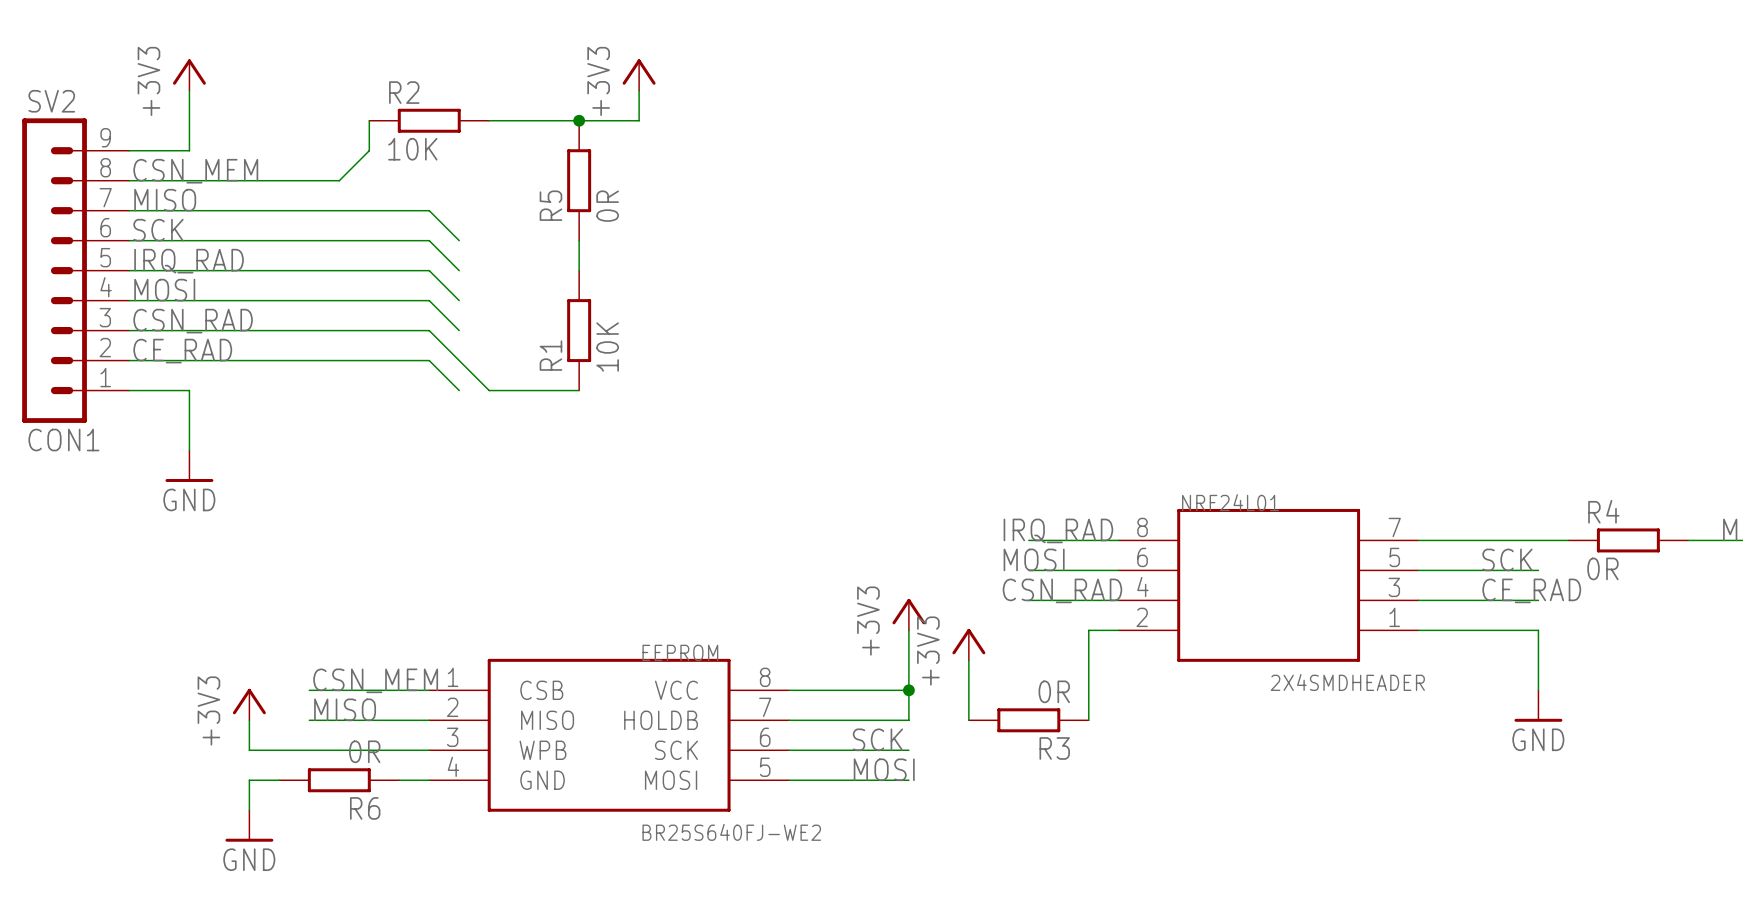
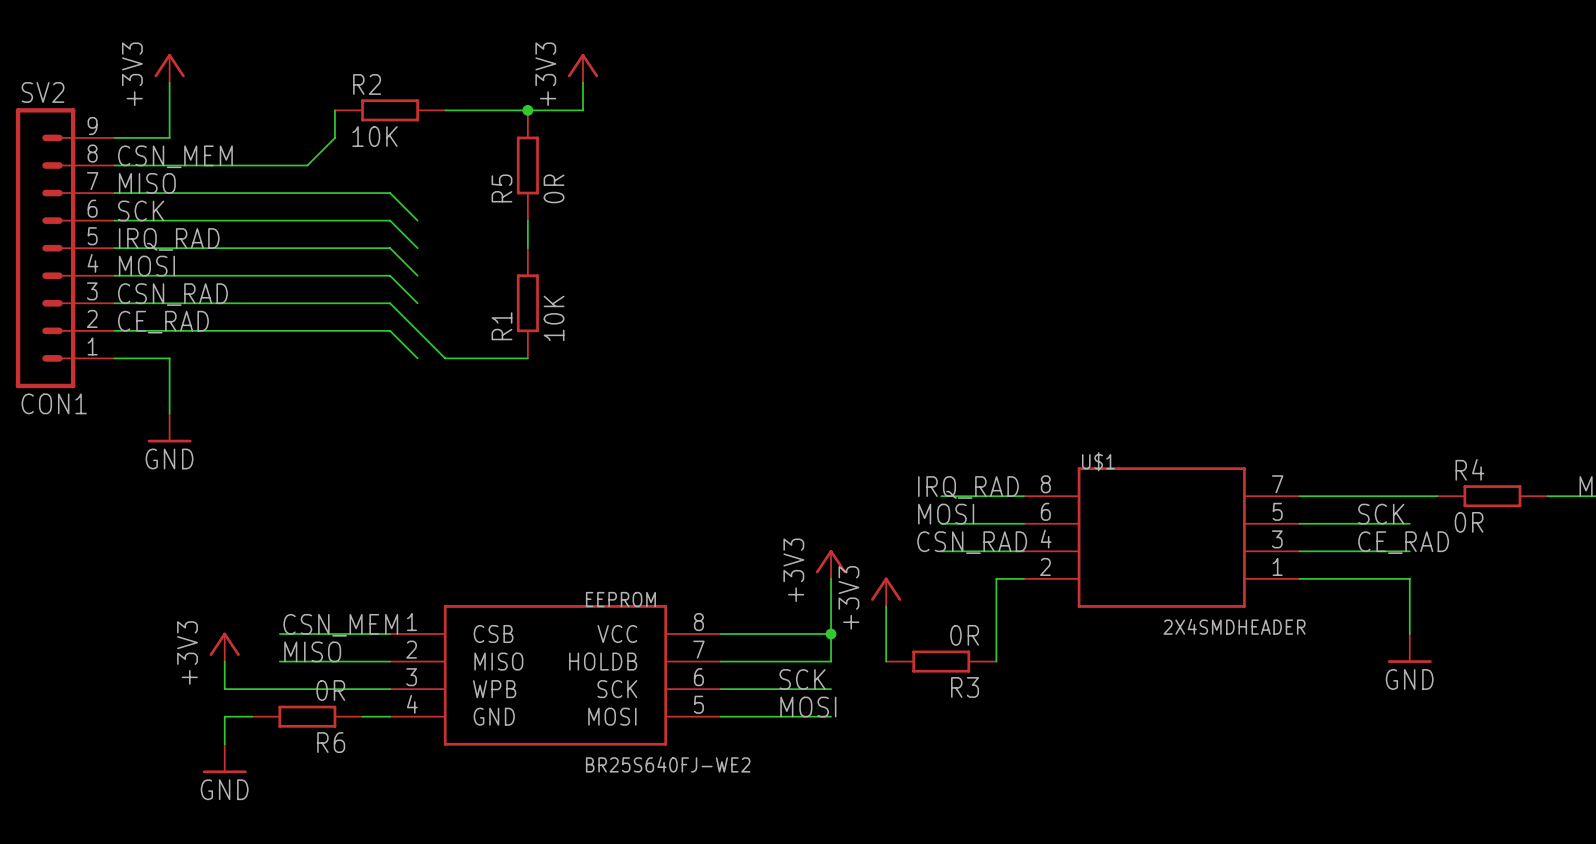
NRF24L01 name: NRF24L01 (1230, 502) -> U$1 (1098, 461)

